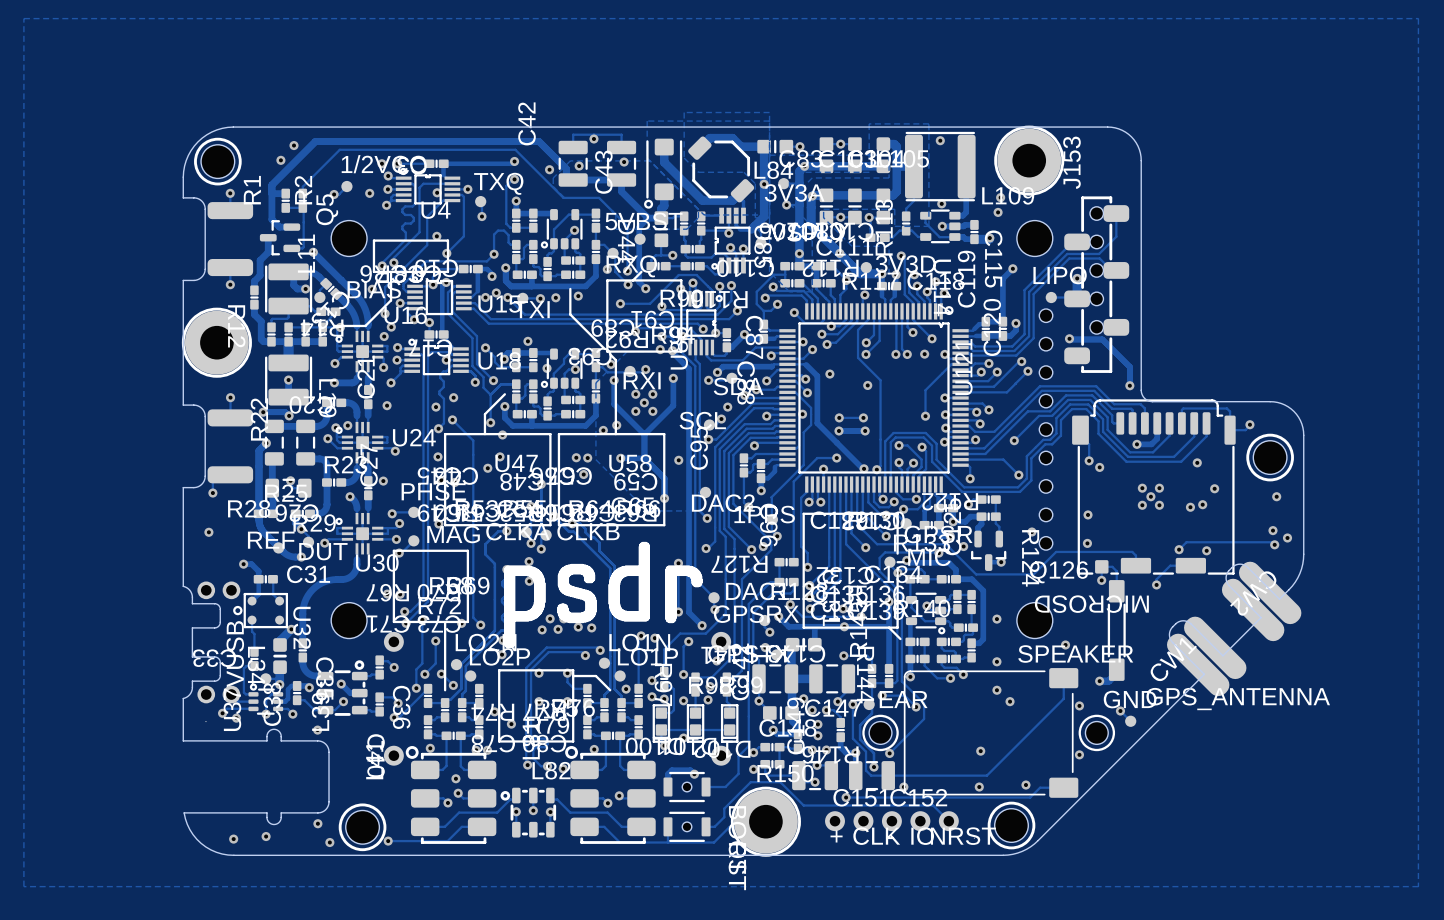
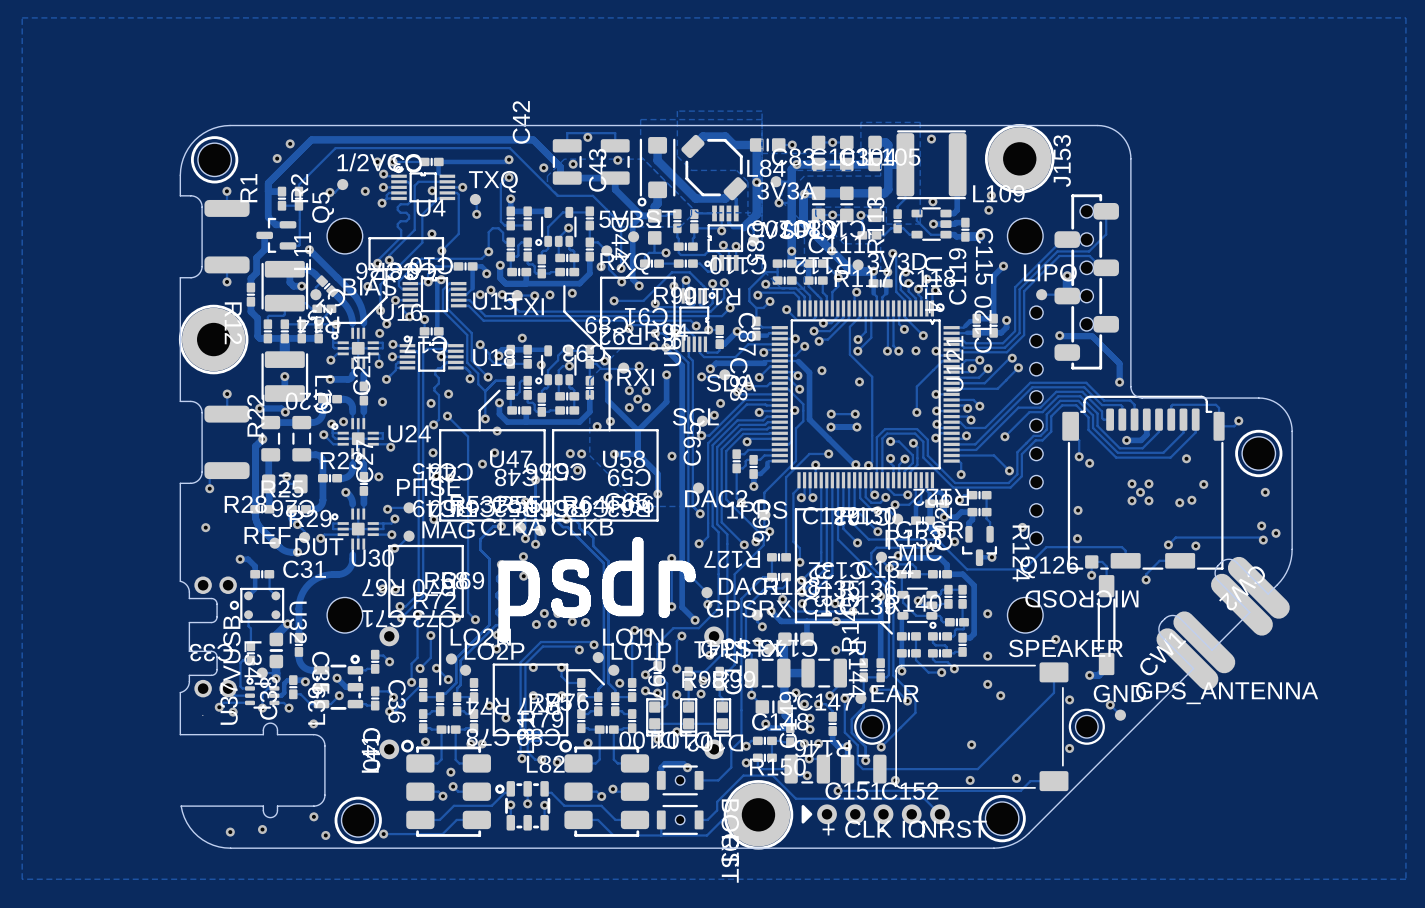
drawing: none -> [801, 804, 813, 824]

